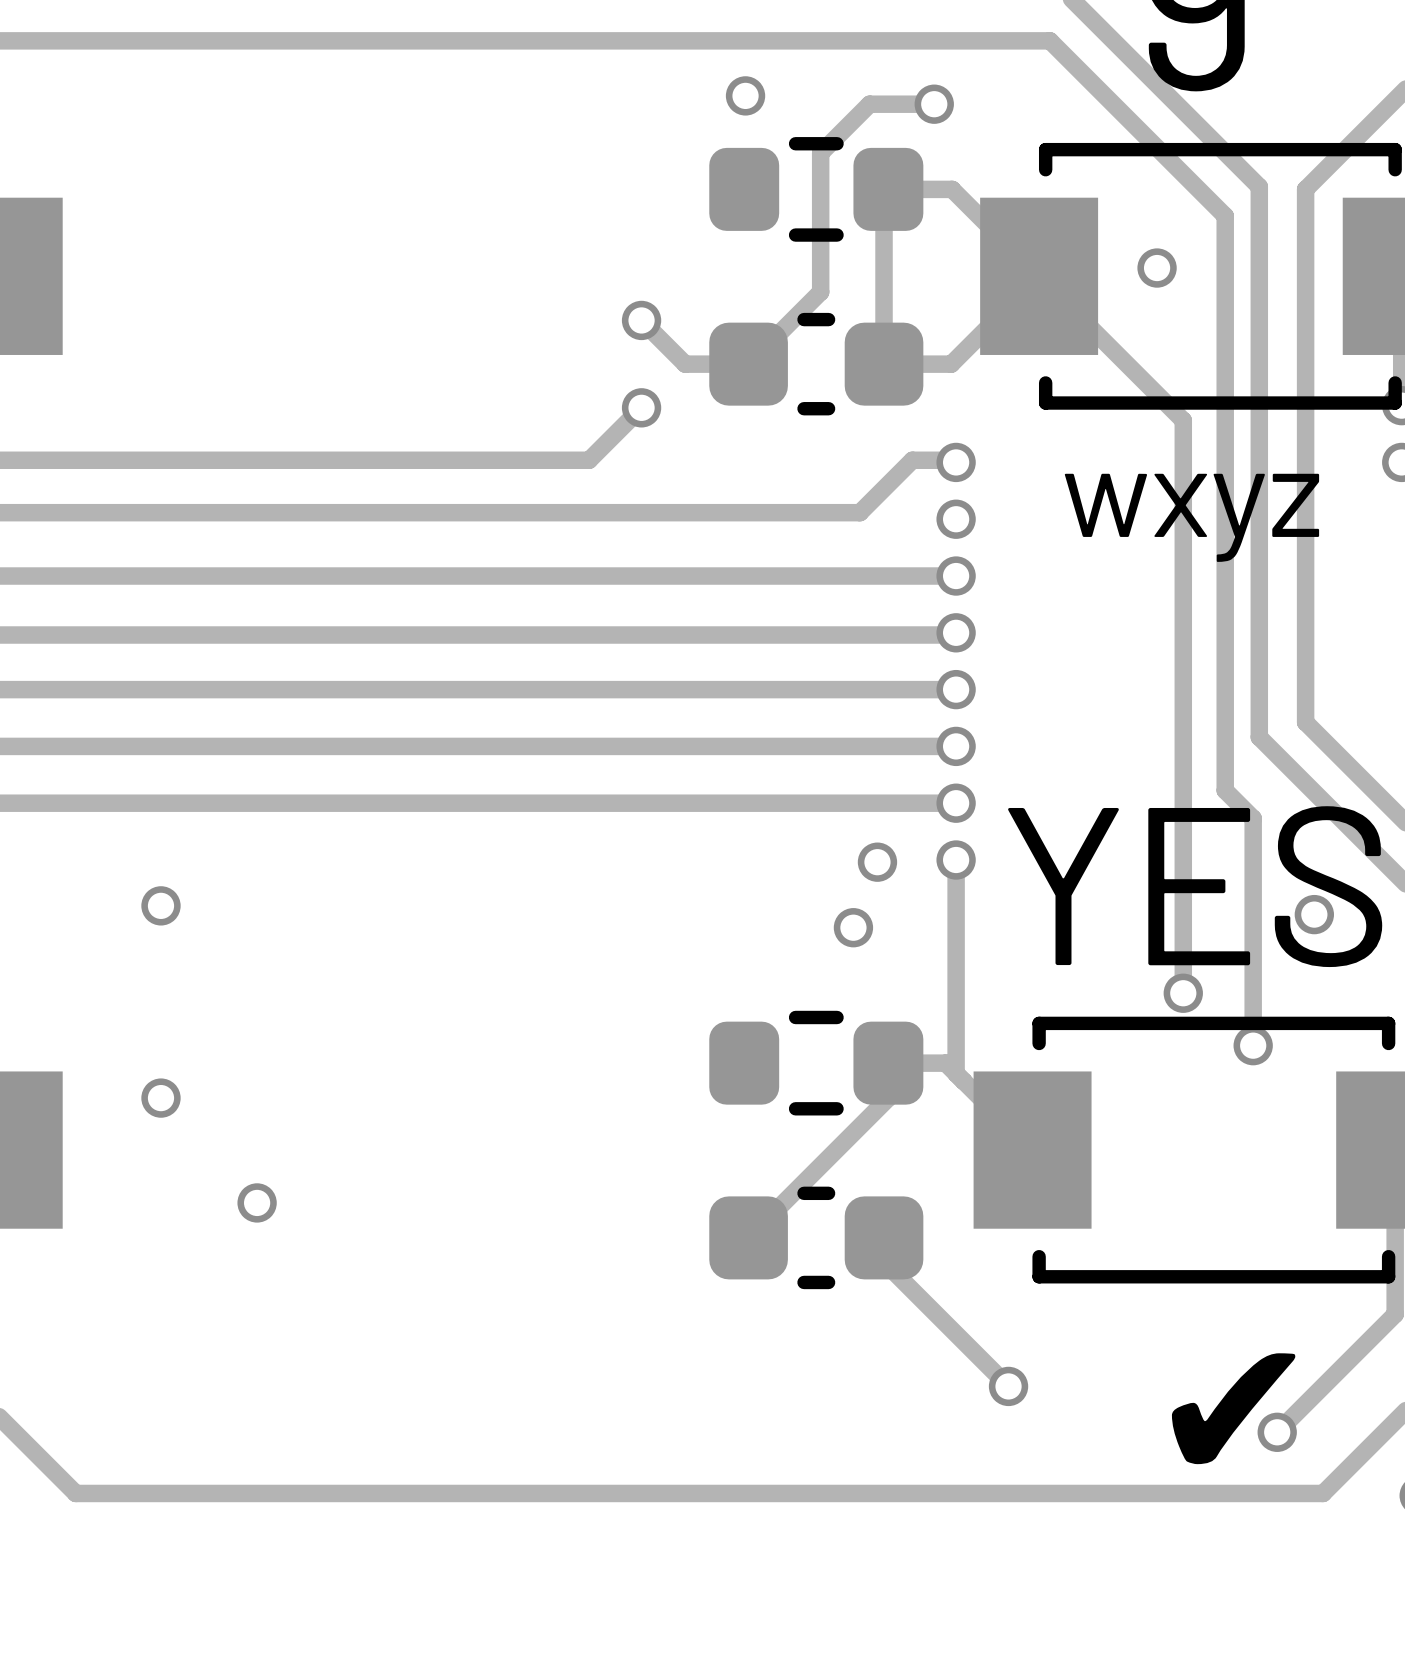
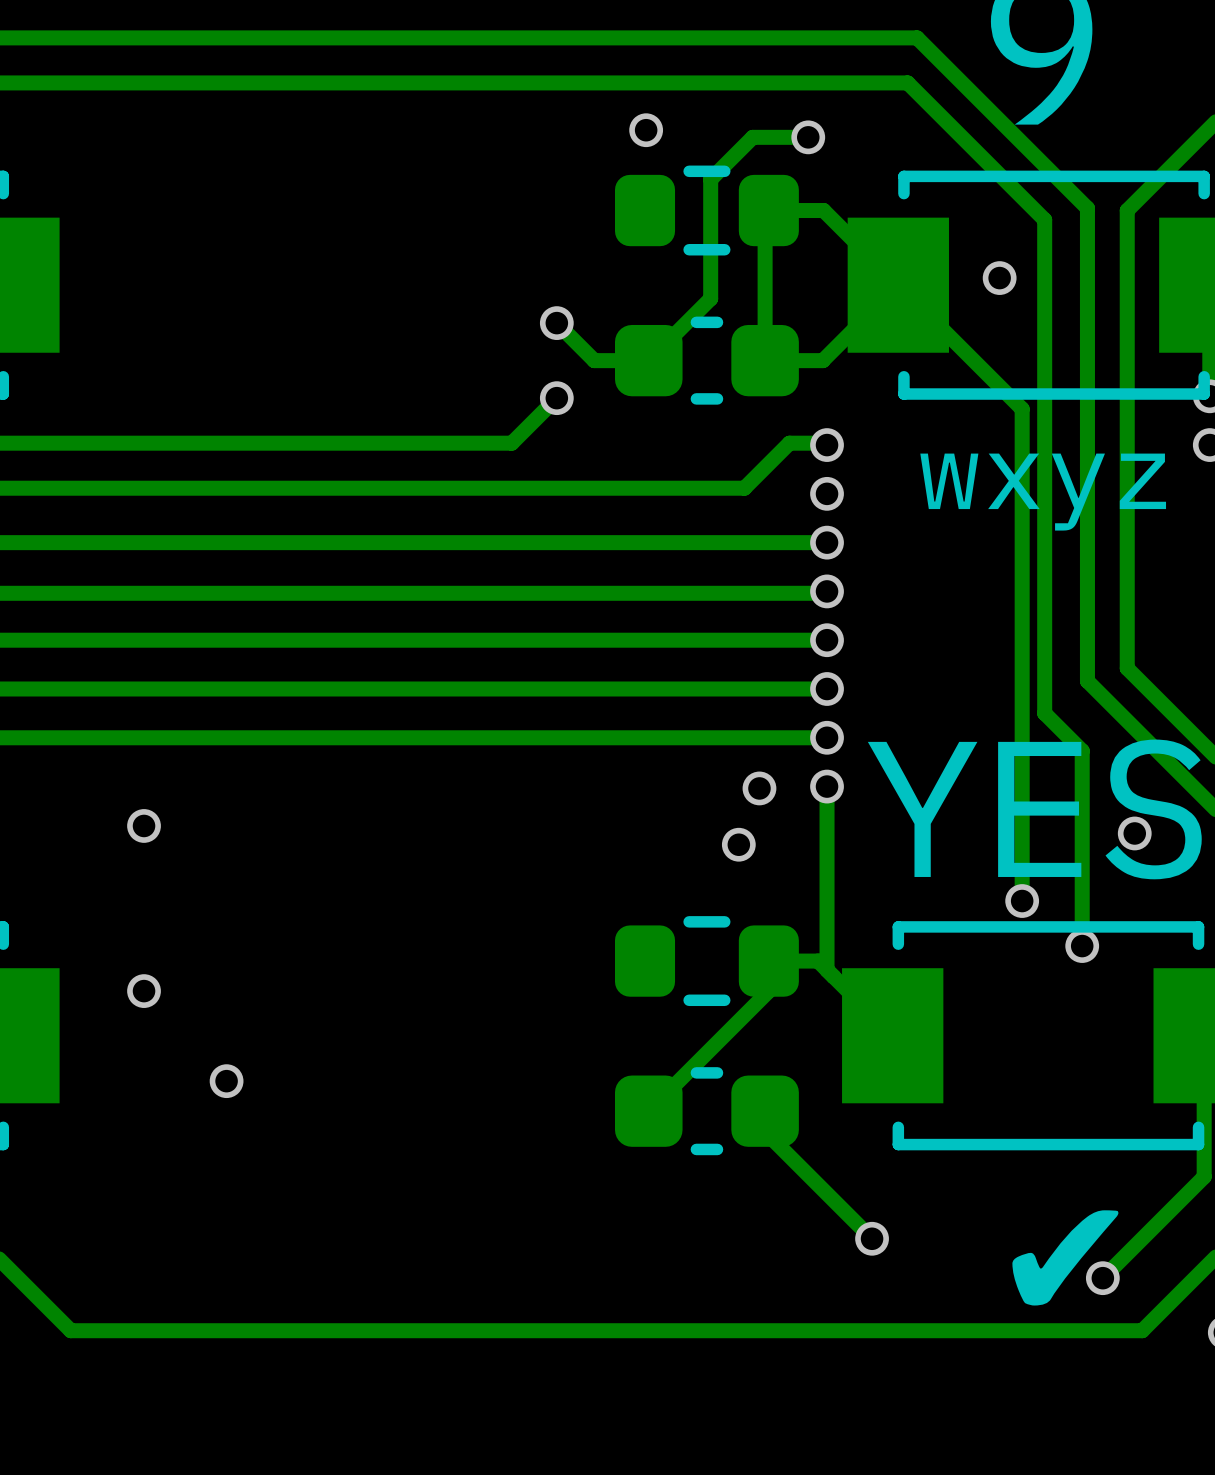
track: (1209, 200) (1225, 216) (1225, 790) -> (1044, 219) (1044, 713) (1058, 726)

